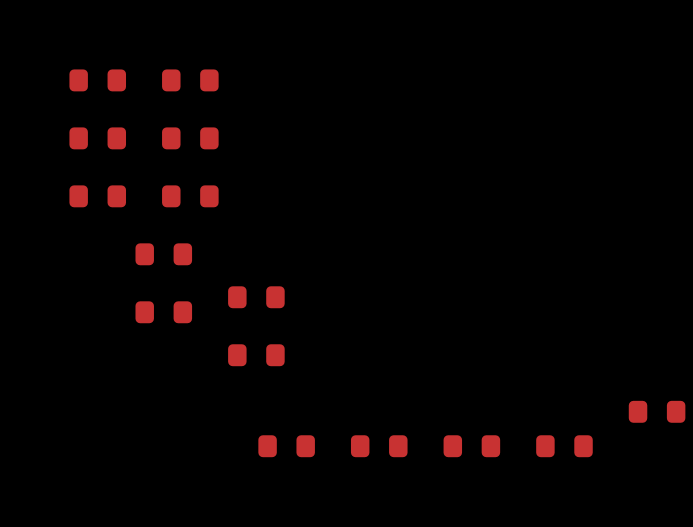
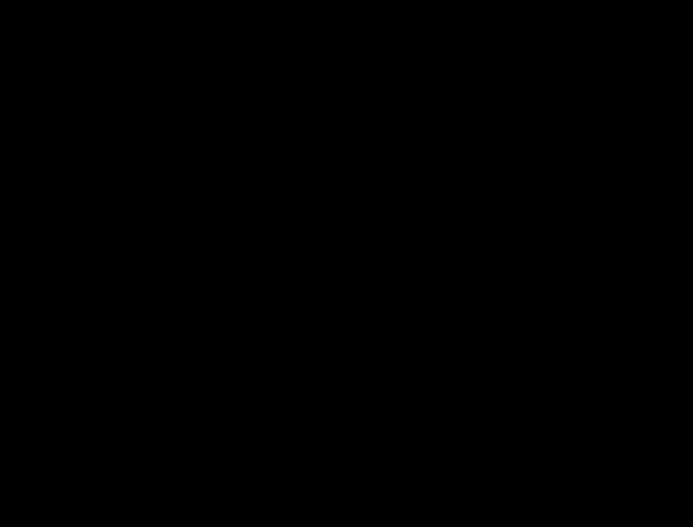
part: (97, 80) -> none
part: (190, 80) -> none
part: (97, 138) -> none
part: (190, 138) -> none
part: (97, 196) -> none
part: (190, 196) -> none
part: (163, 254) -> none
part: (256, 297) -> none
part: (163, 312) -> none
part: (256, 355) -> none
part: (657, 411) -> none
part: (286, 446) -> none
part: (379, 446) -> none
part: (471, 446) -> none
part: (564, 446) -> none

